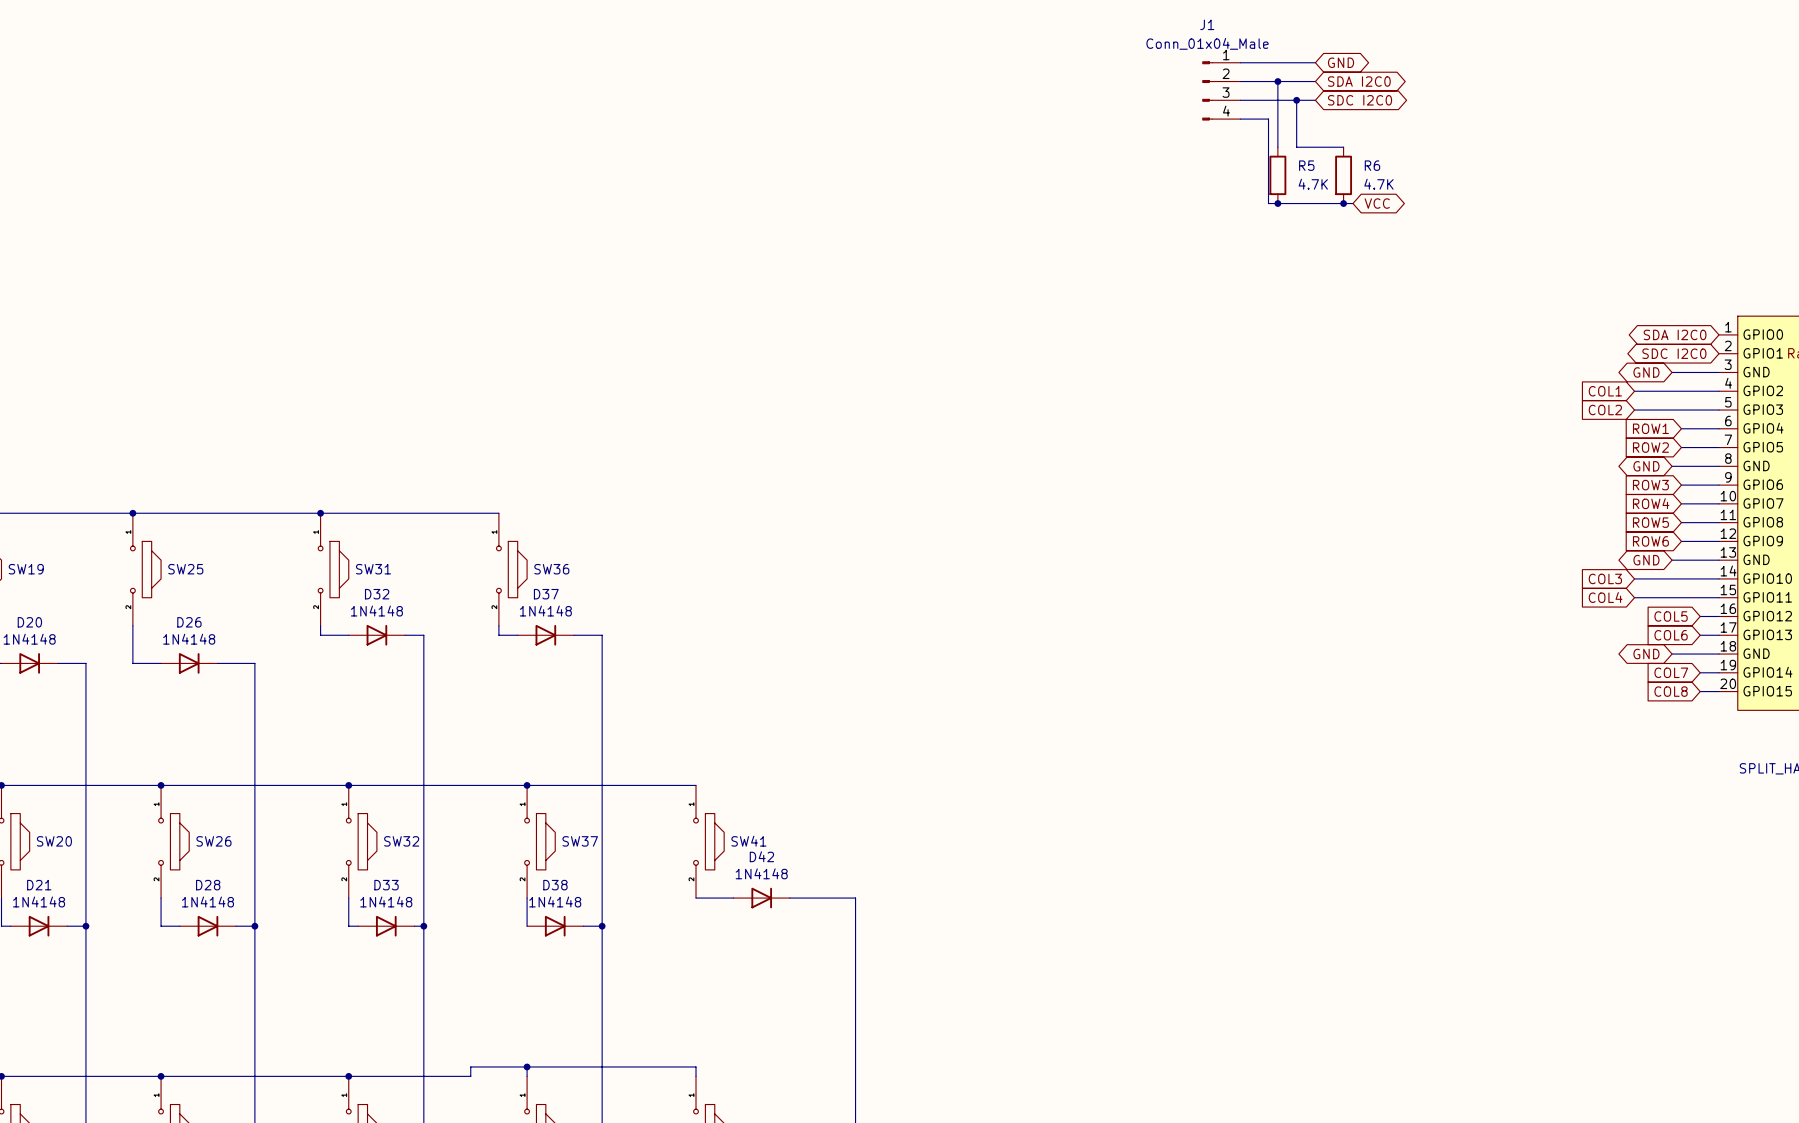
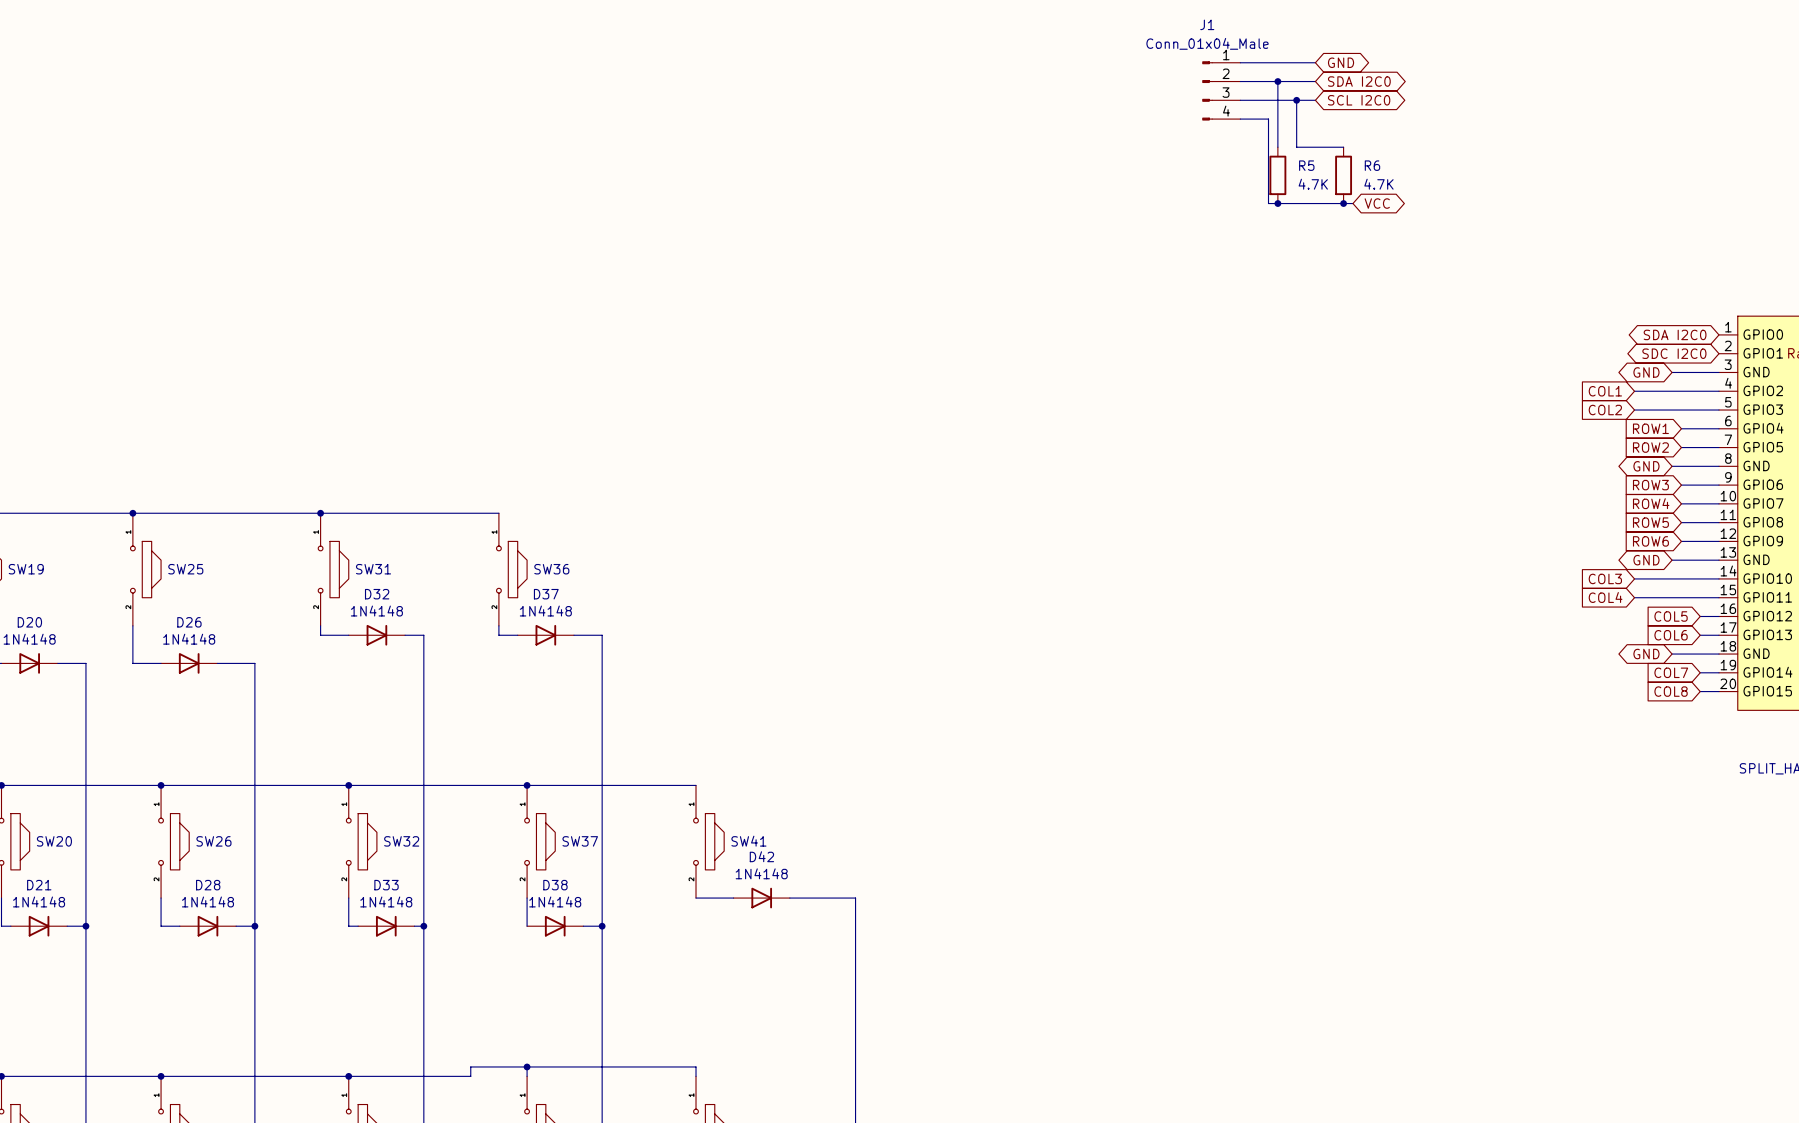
global label: SDC I2C0 (1360, 100) -> SCL I2C0 (1359, 100)

